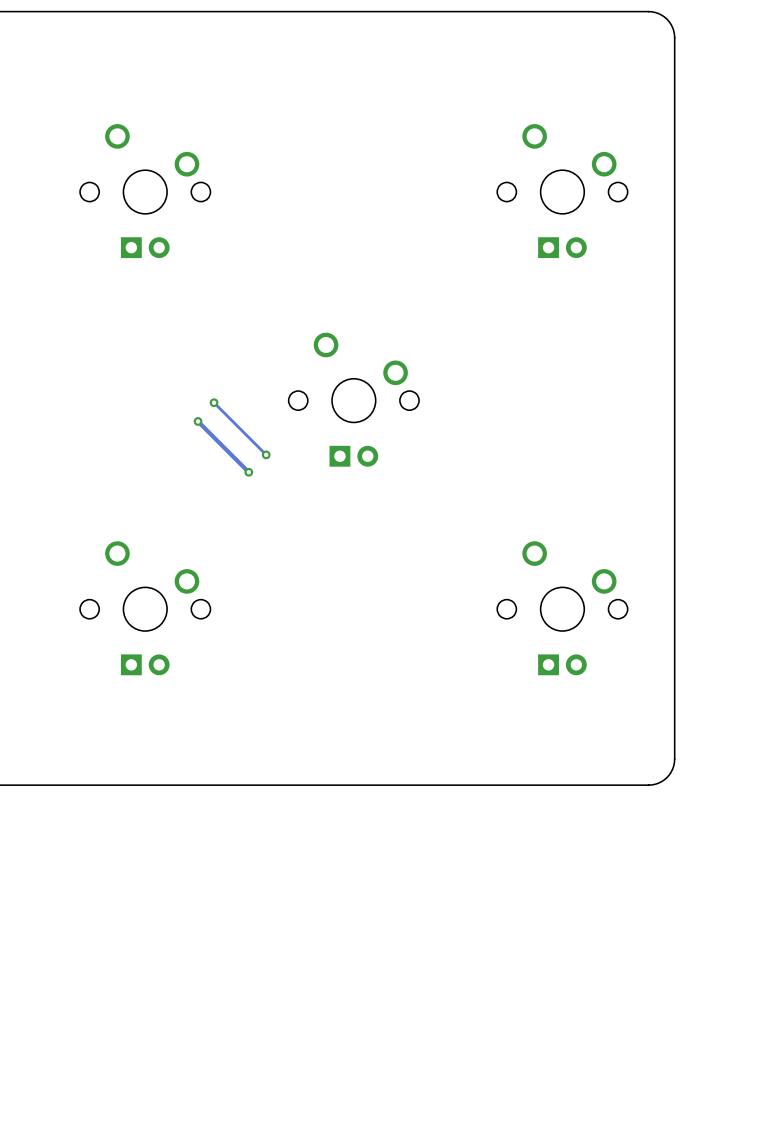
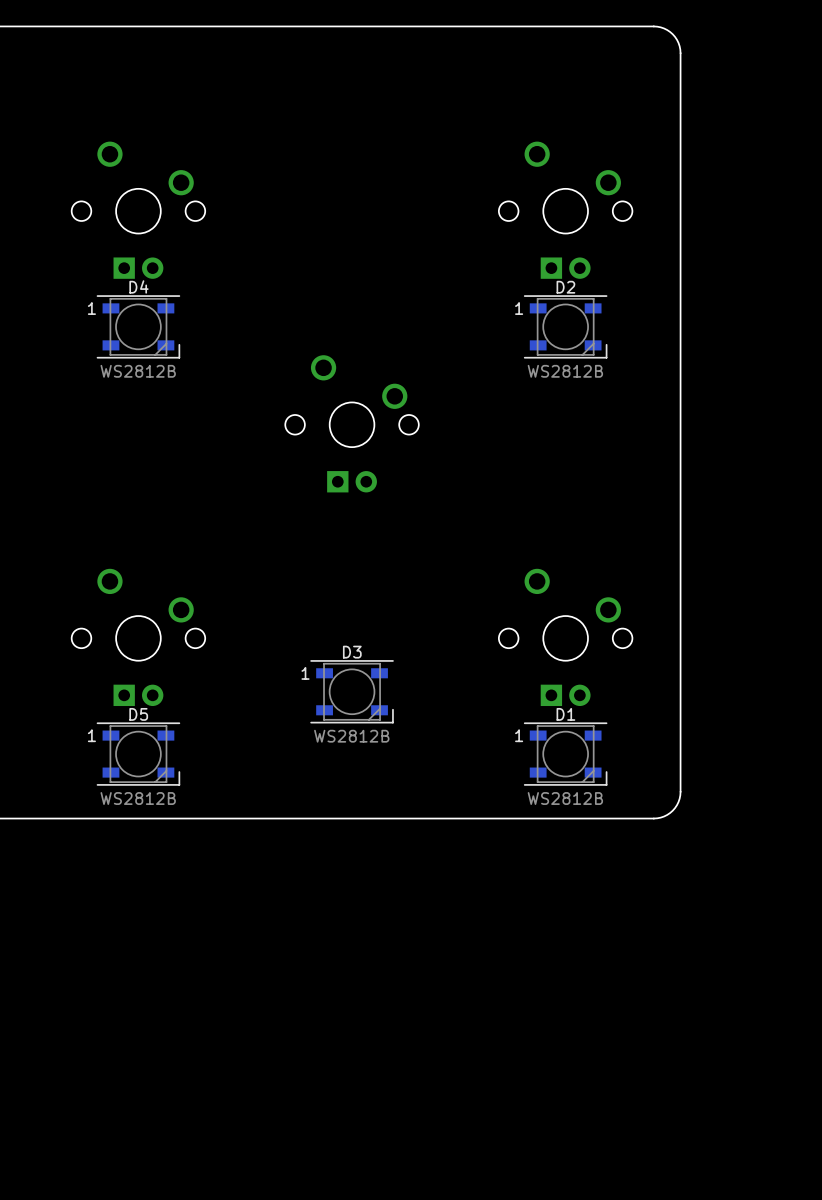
D4: none -> WS2812B (138, 326)
D2: none -> WS2812B (565, 326)
track: (214, 402) (266, 454) -> none
via: (214, 402) -> none
track: (198, 421) (248, 472) -> none
via: (198, 421) -> none
via: (266, 454) -> none
via: (248, 472) -> none
D3: none -> WS2812B (352, 691)
D5: none -> WS2812B (138, 754)
D1: none -> WS2812B (565, 754)

